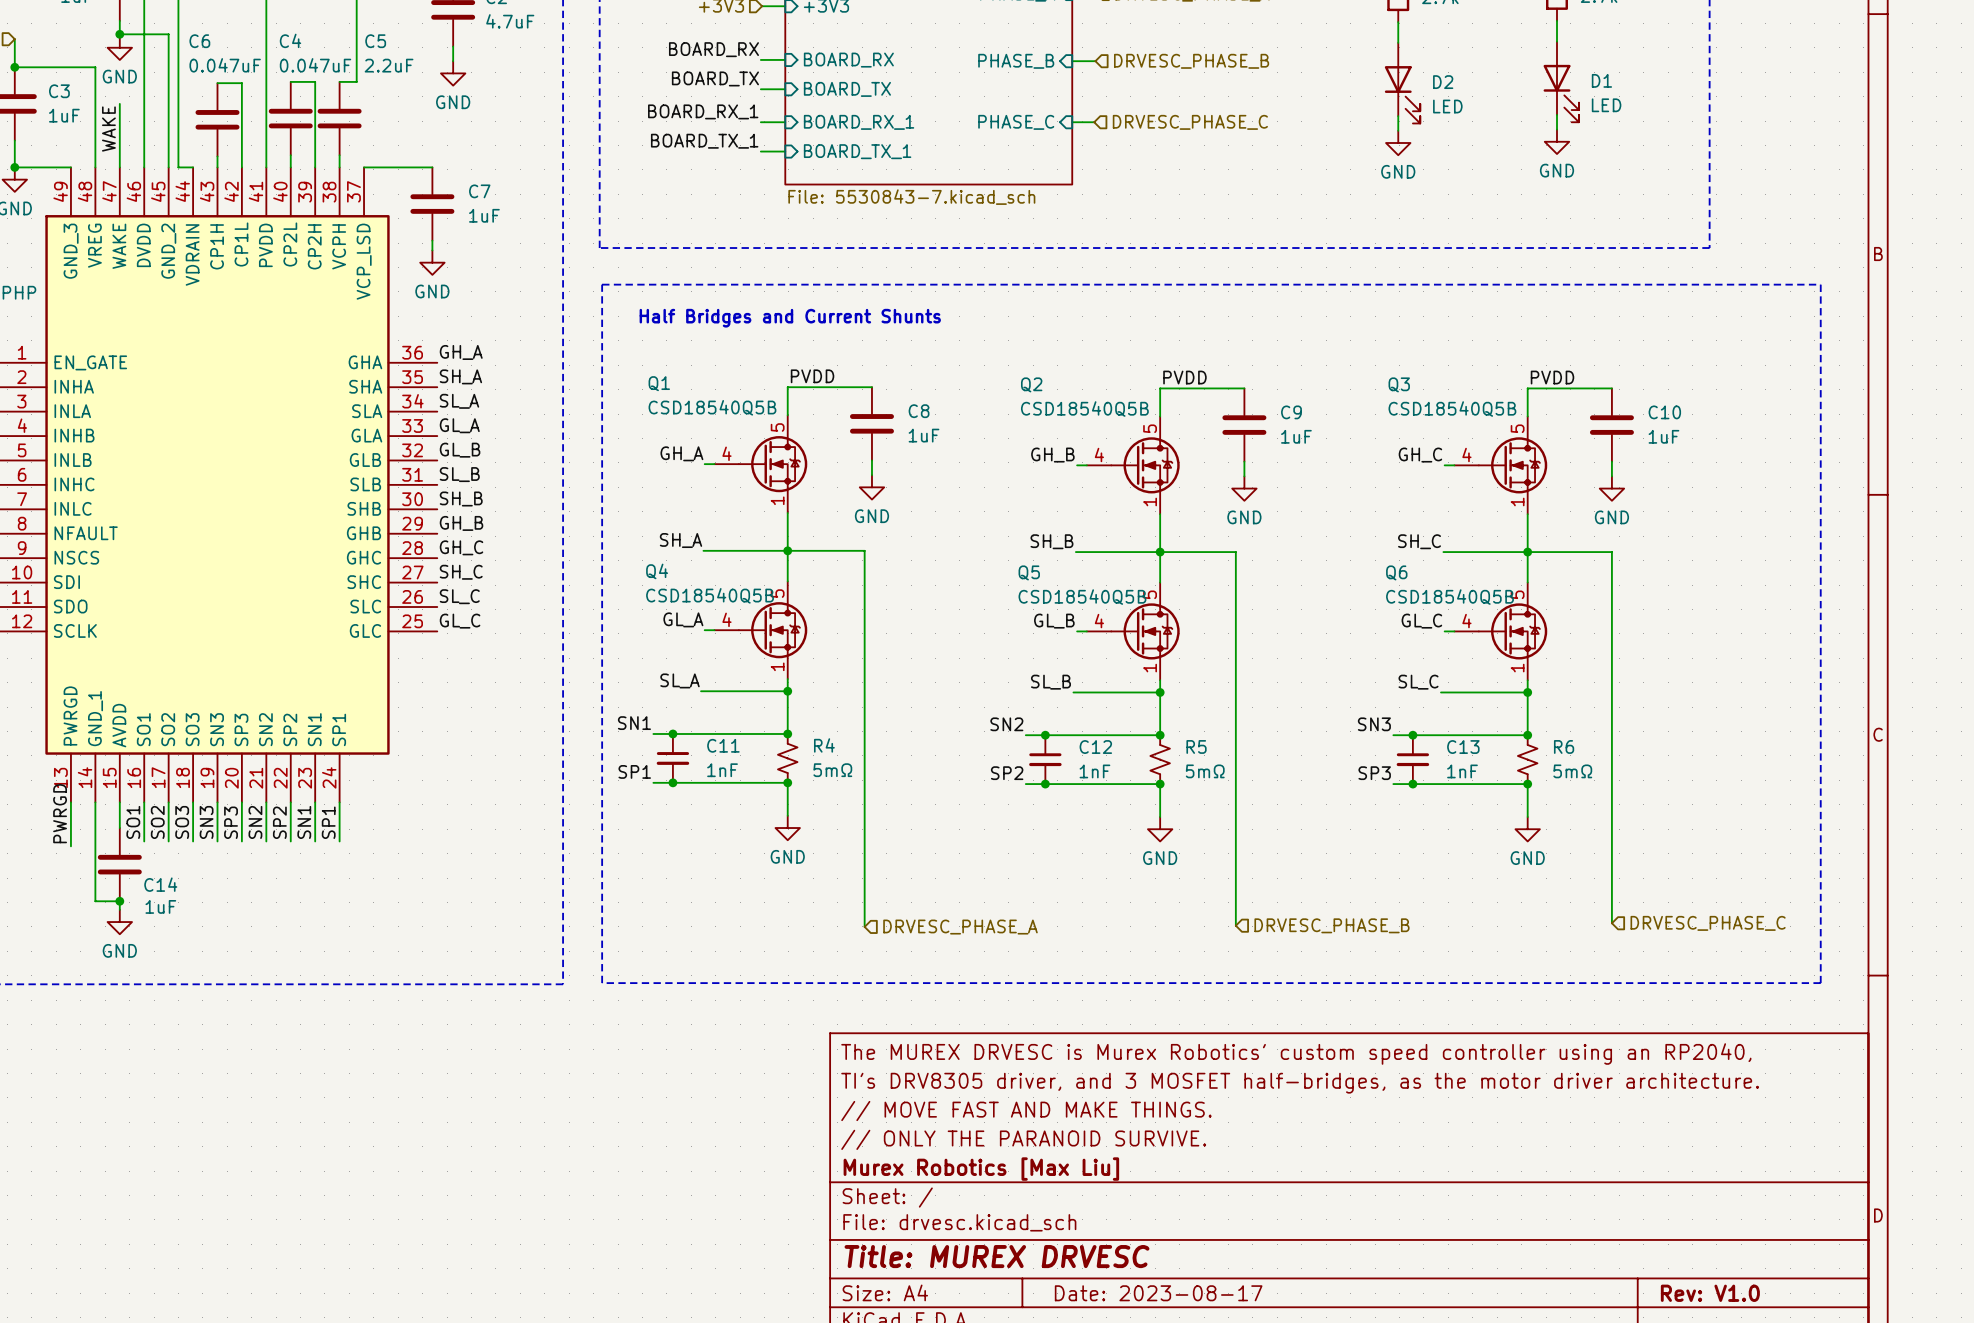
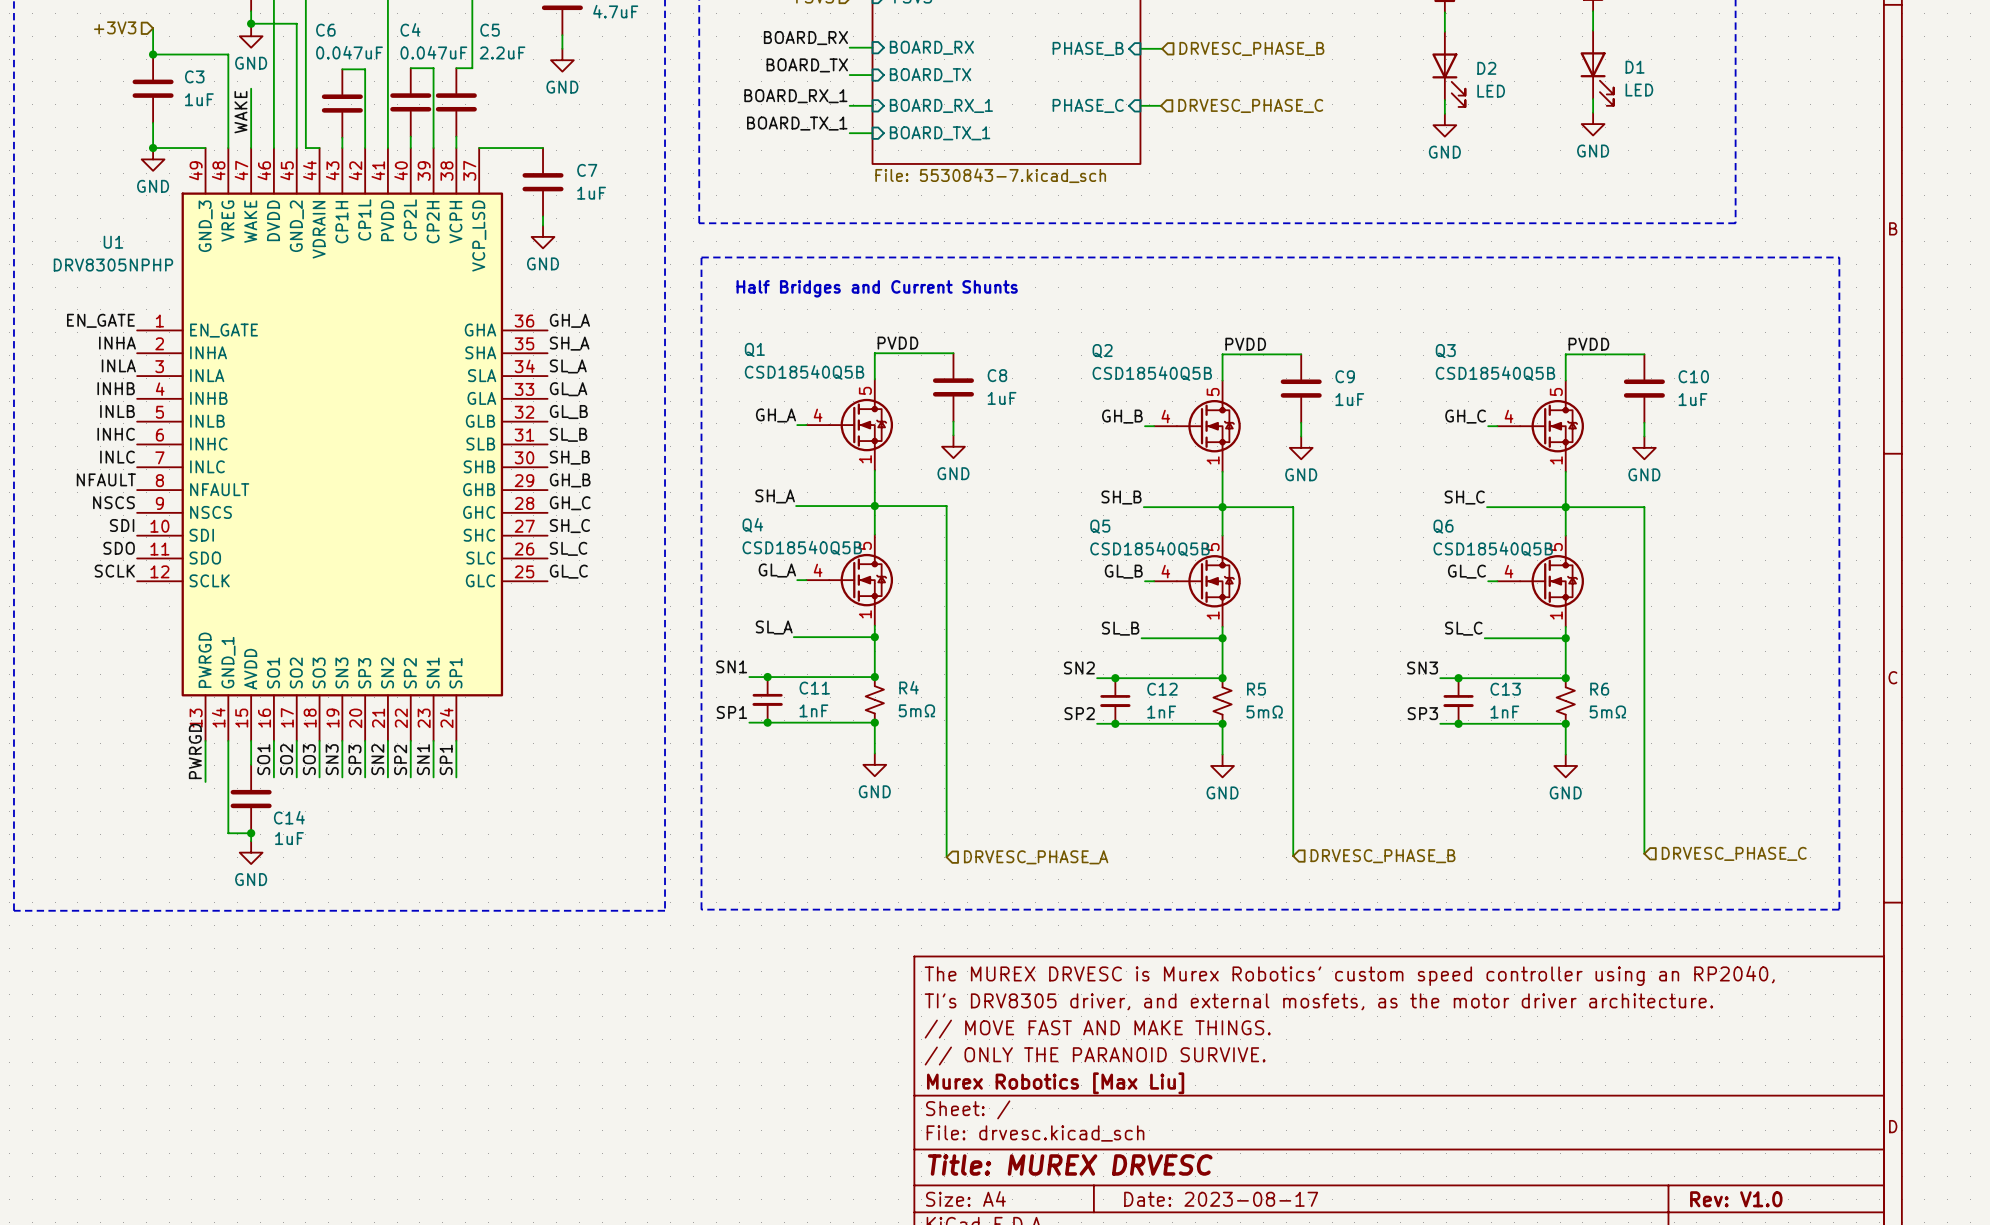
title block: TI's DRV8305 driver, and 3 MOSFET half-bridges, as the motor driver architecture. (1300, 1083) -> TI's DRV8305 driver, and external mosfets, as the motor driver architecture. (1318, 1001)

